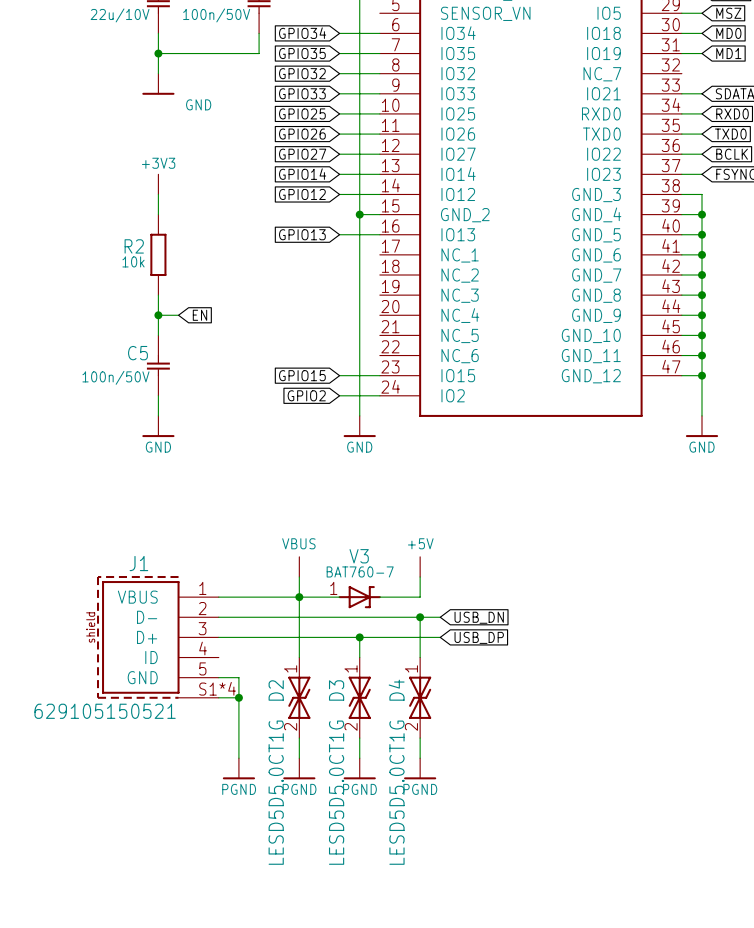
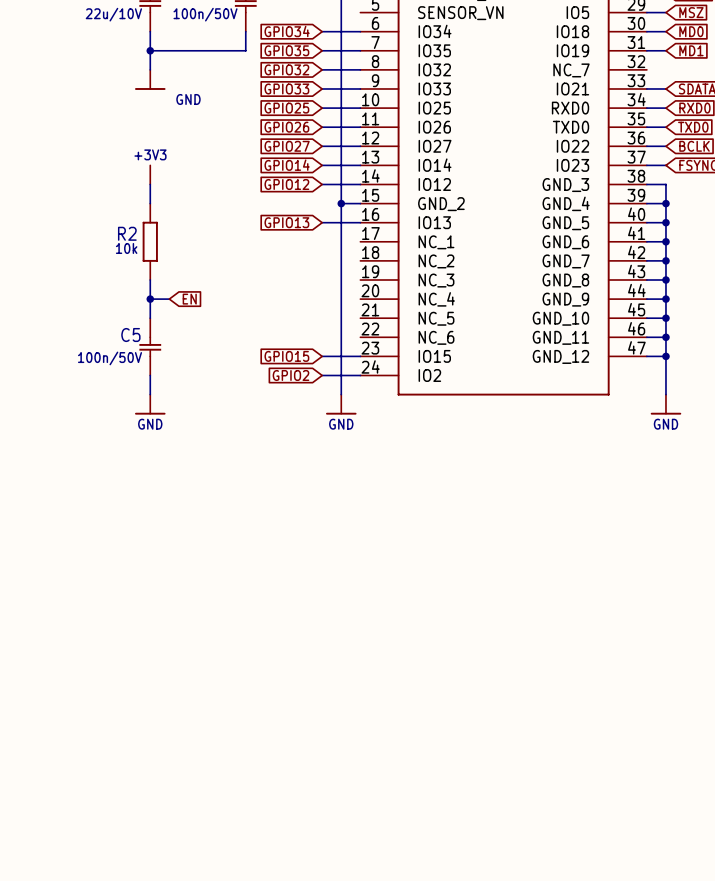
power symbol: VBUS (299, 566) -> none
power symbol: +5V (420, 566) -> none
wire: (299, 577) (299, 657) -> none
wire: (420, 577) (420, 597) (379, 597) -> none
wire: (218, 597) (339, 597) -> none
junction: (299, 597) -> none
V3: BAT760-7 (359, 597) -> none
wire: (218, 617) (440, 617) -> none
wire: (420, 617) (420, 657) -> none
junction: (420, 617) -> none
global label: USB_DN (479, 617) -> none
J1: 629105150521 (157, 637) -> none
wire: (218, 637) (440, 637) -> none
wire: (359, 637) (359, 657) -> none
junction: (359, 637) -> none
global label: USB_DP (479, 637) -> none
wire: (218, 677) (238, 677) (238, 758) -> none
wire: (218, 697) (238, 697) -> none
junction: (238, 697) -> none
D2: LESD5D5.0CT1G (299, 697) -> none
D3: LESD5D5.0CT1G (359, 697) -> none
D4: LESD5D5.0CT1G (420, 697) -> none
wire: (299, 738) (299, 758) -> none
wire: (359, 738) (359, 758) -> none
wire: (420, 738) (420, 758) -> none
power symbol: PGND (238, 768) -> none
power symbol: PGND (299, 768) -> none
power symbol: PGND (359, 768) -> none
power symbol: PGND (420, 768) -> none

